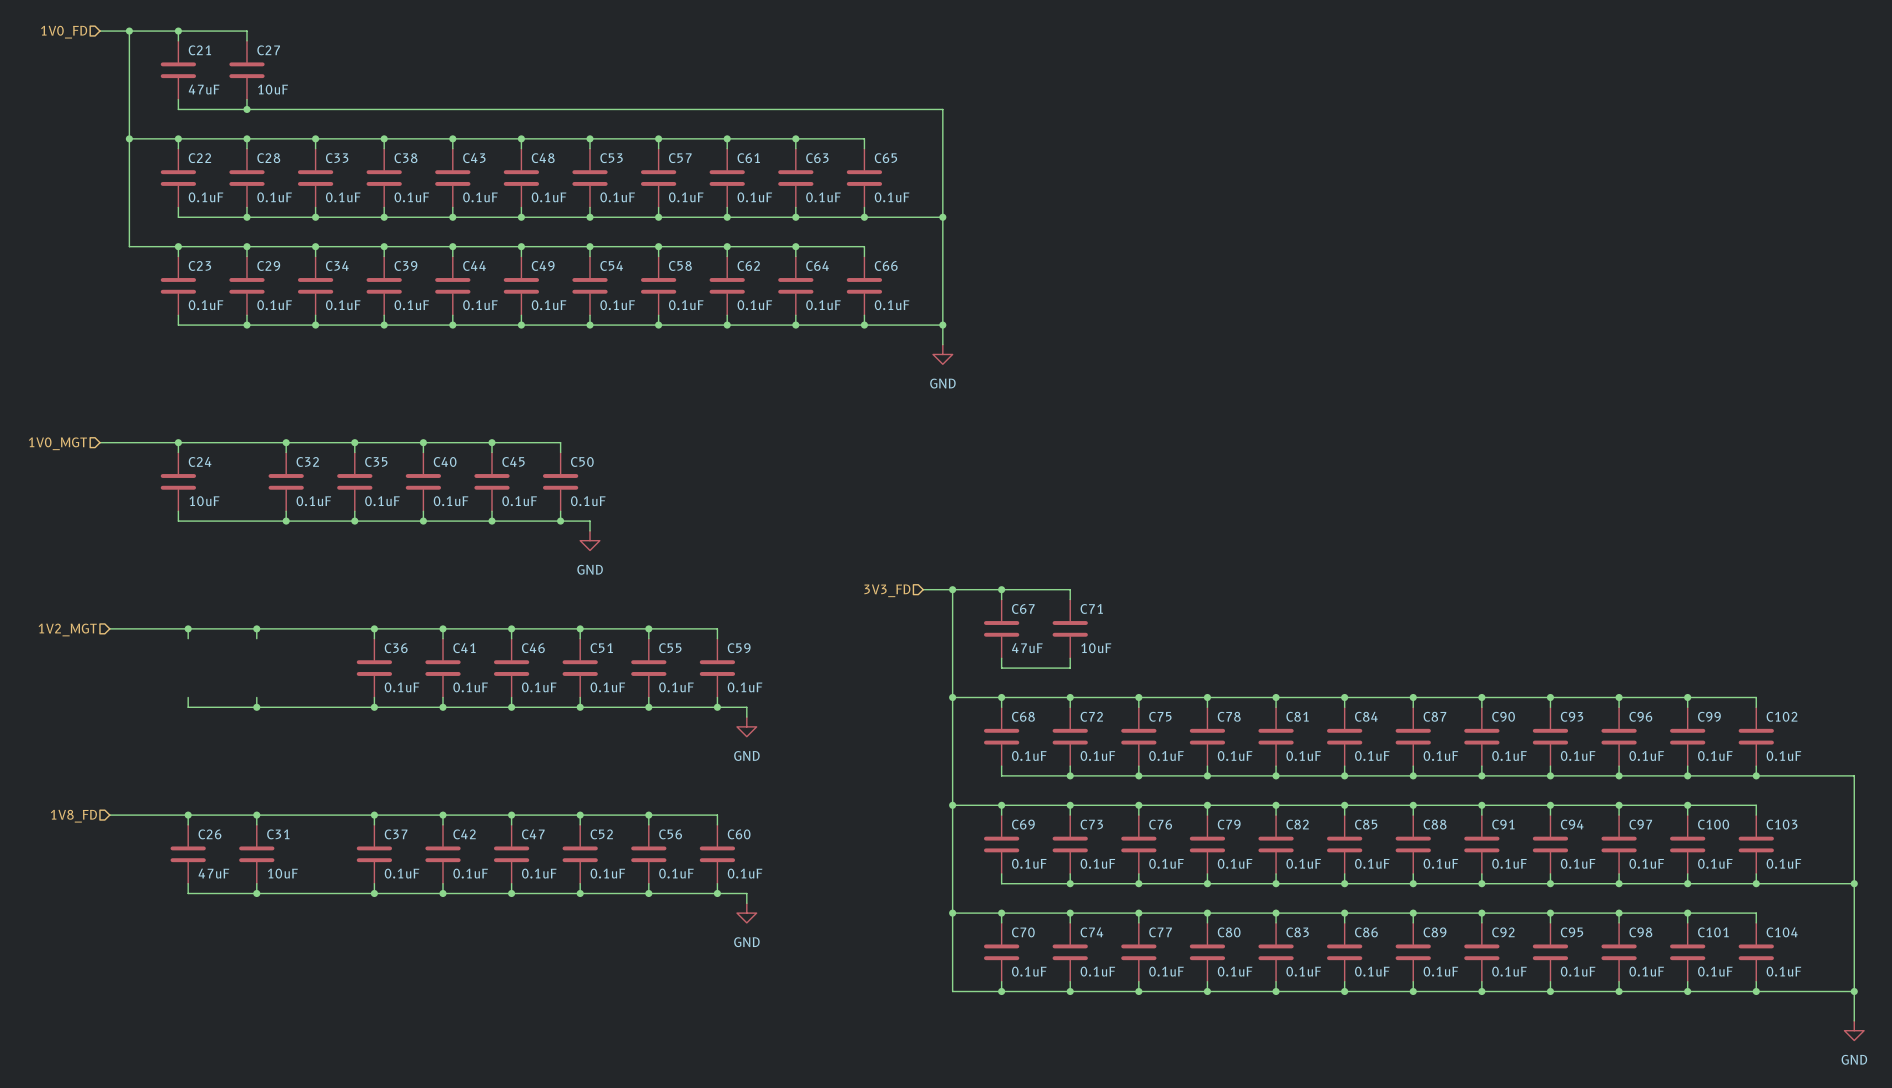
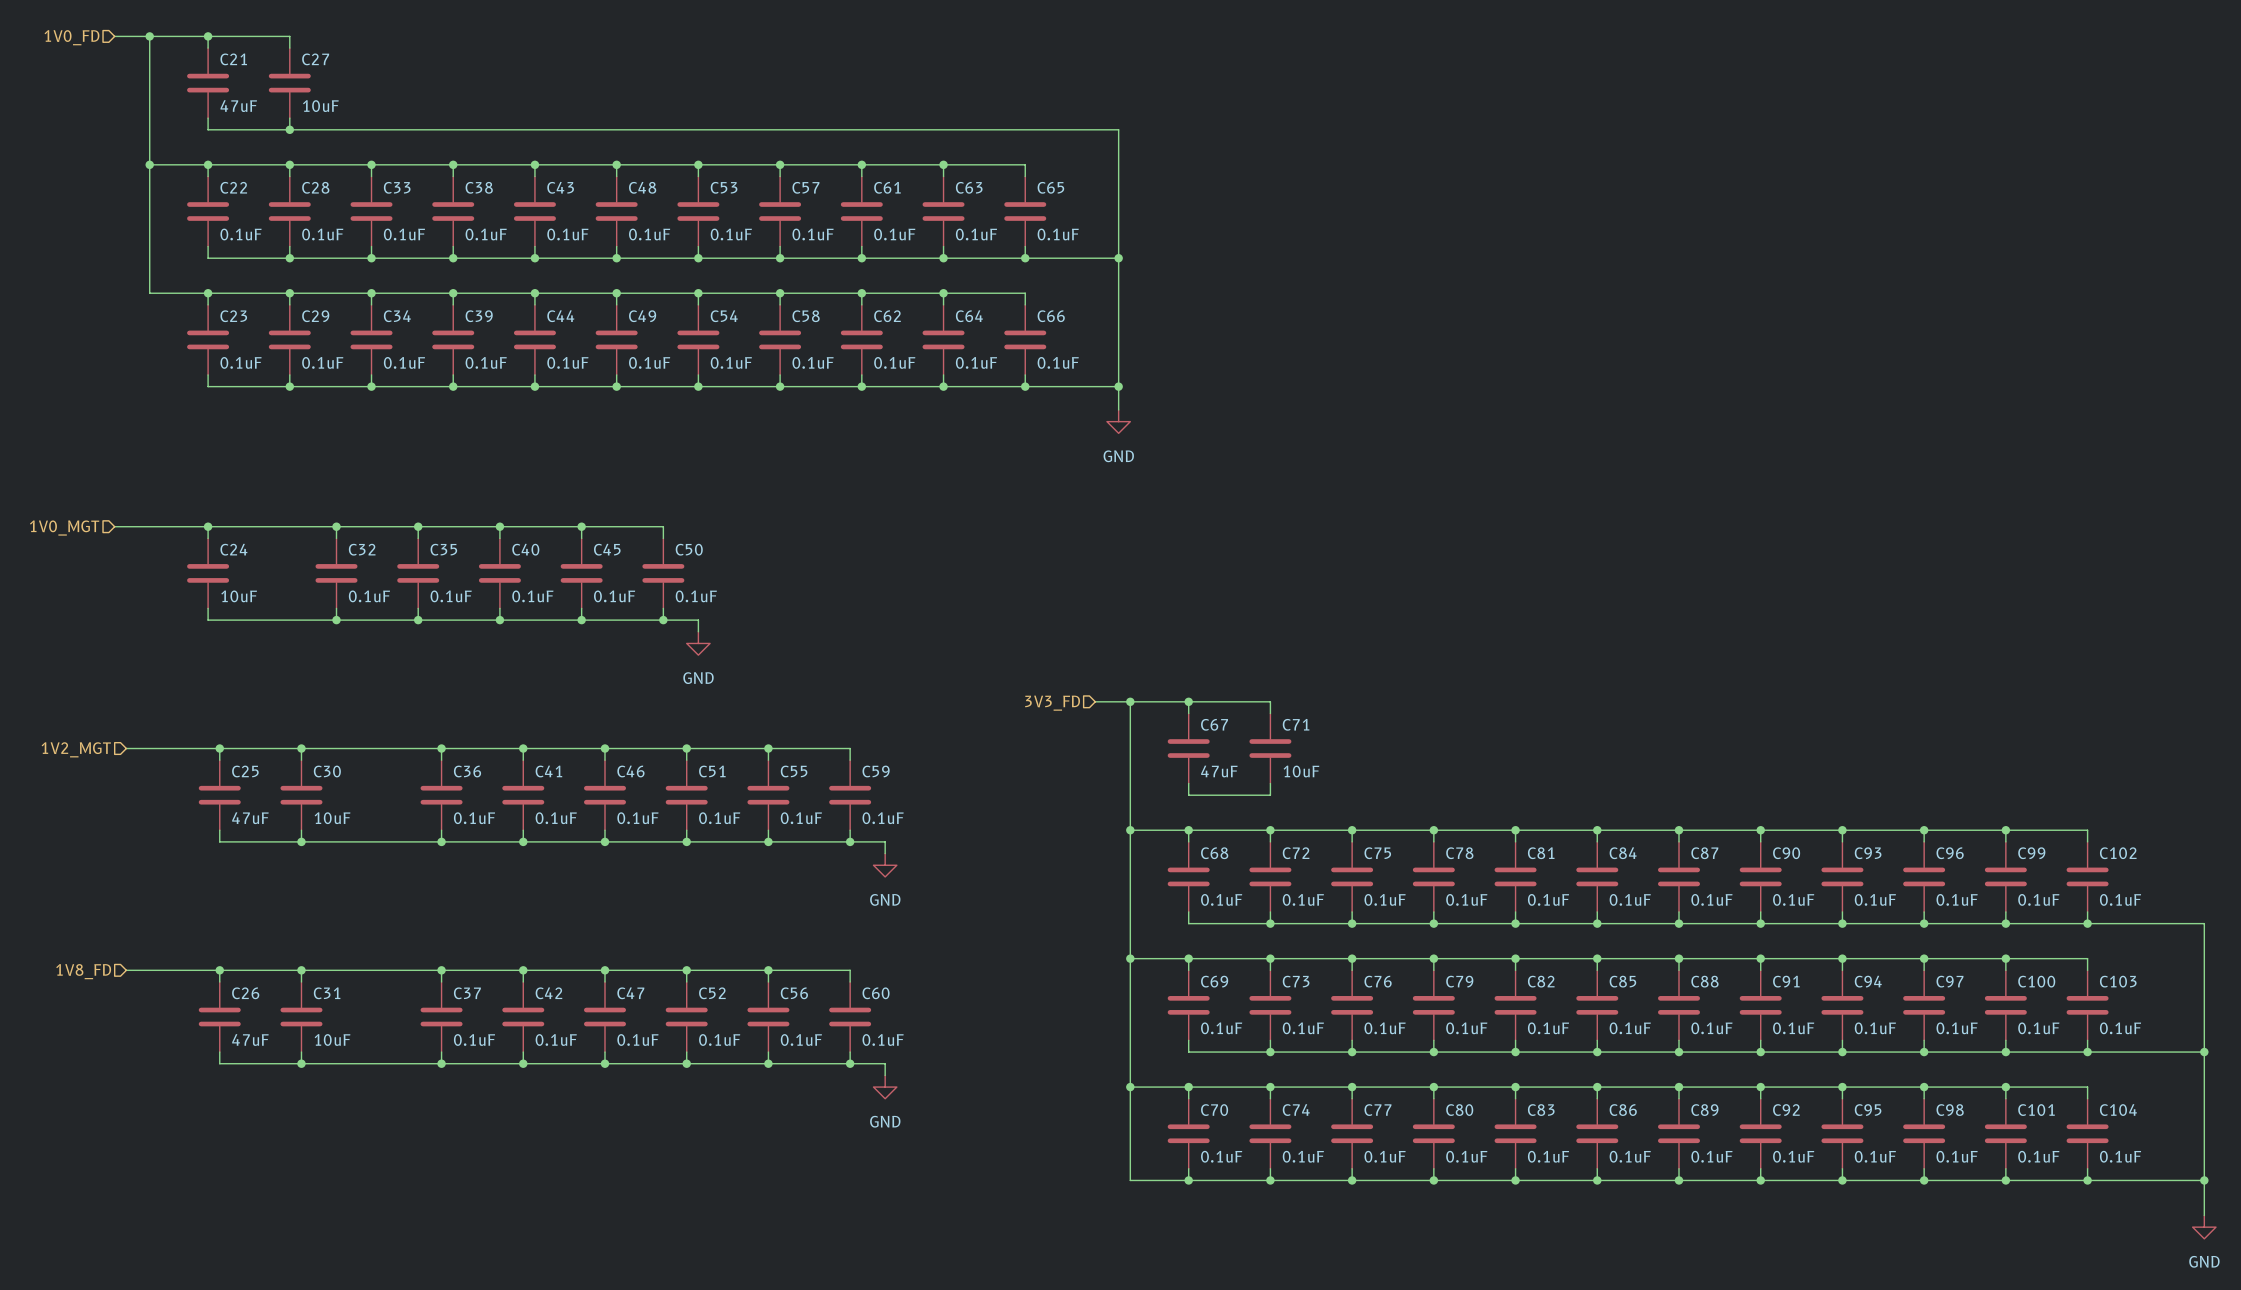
C25: none -> 47uF (219, 795)
C30: none -> 10uF (301, 795)

